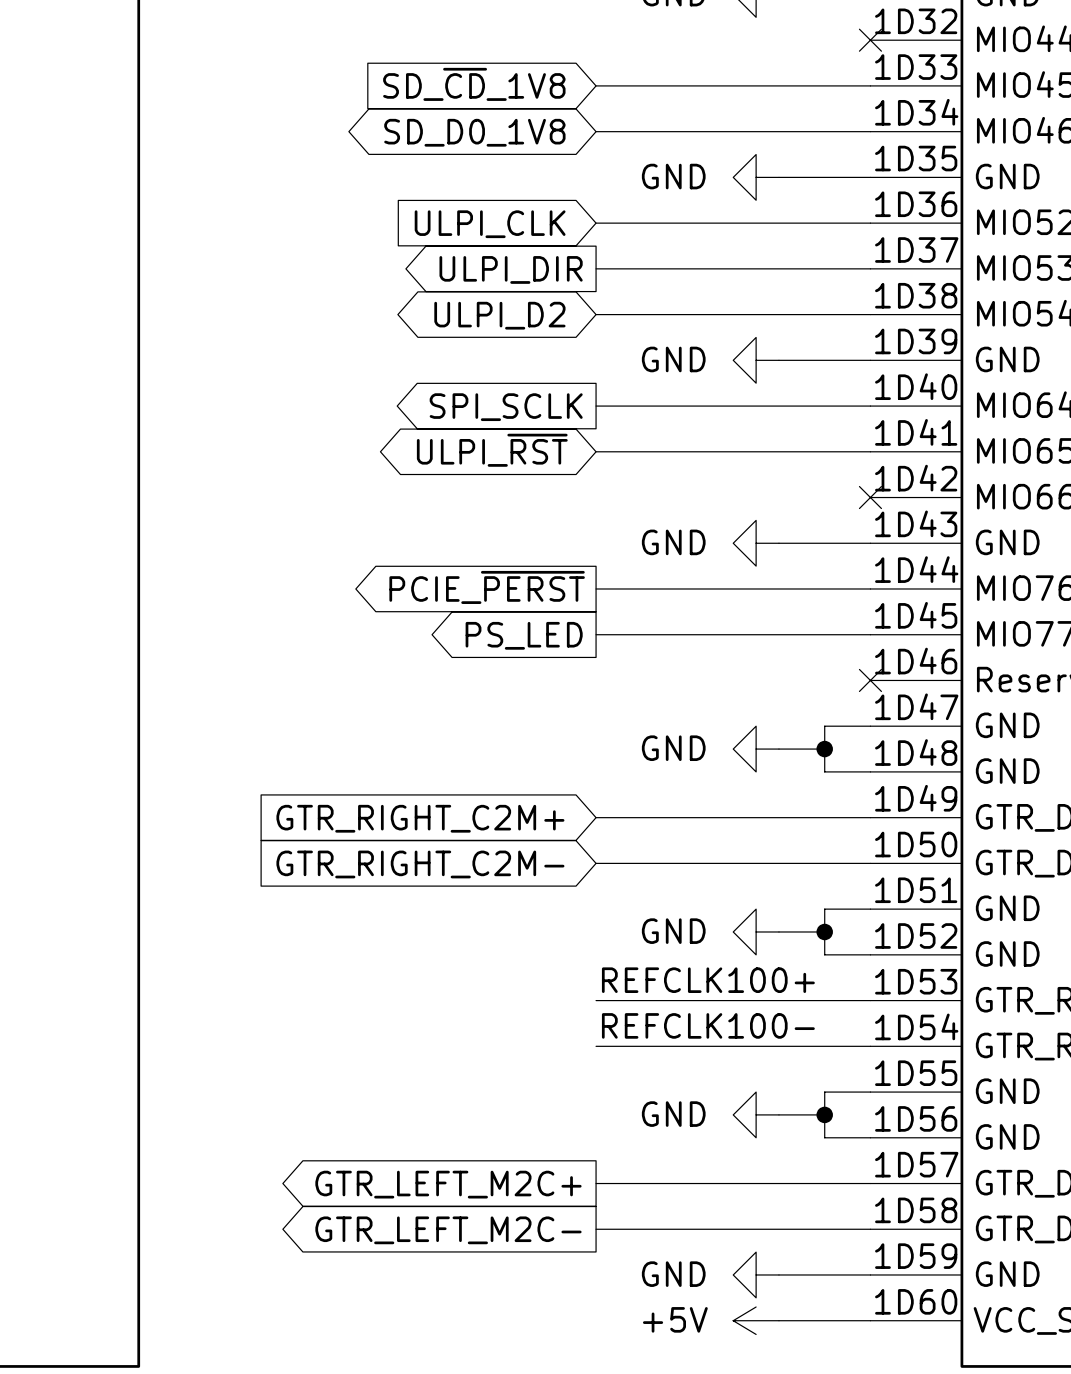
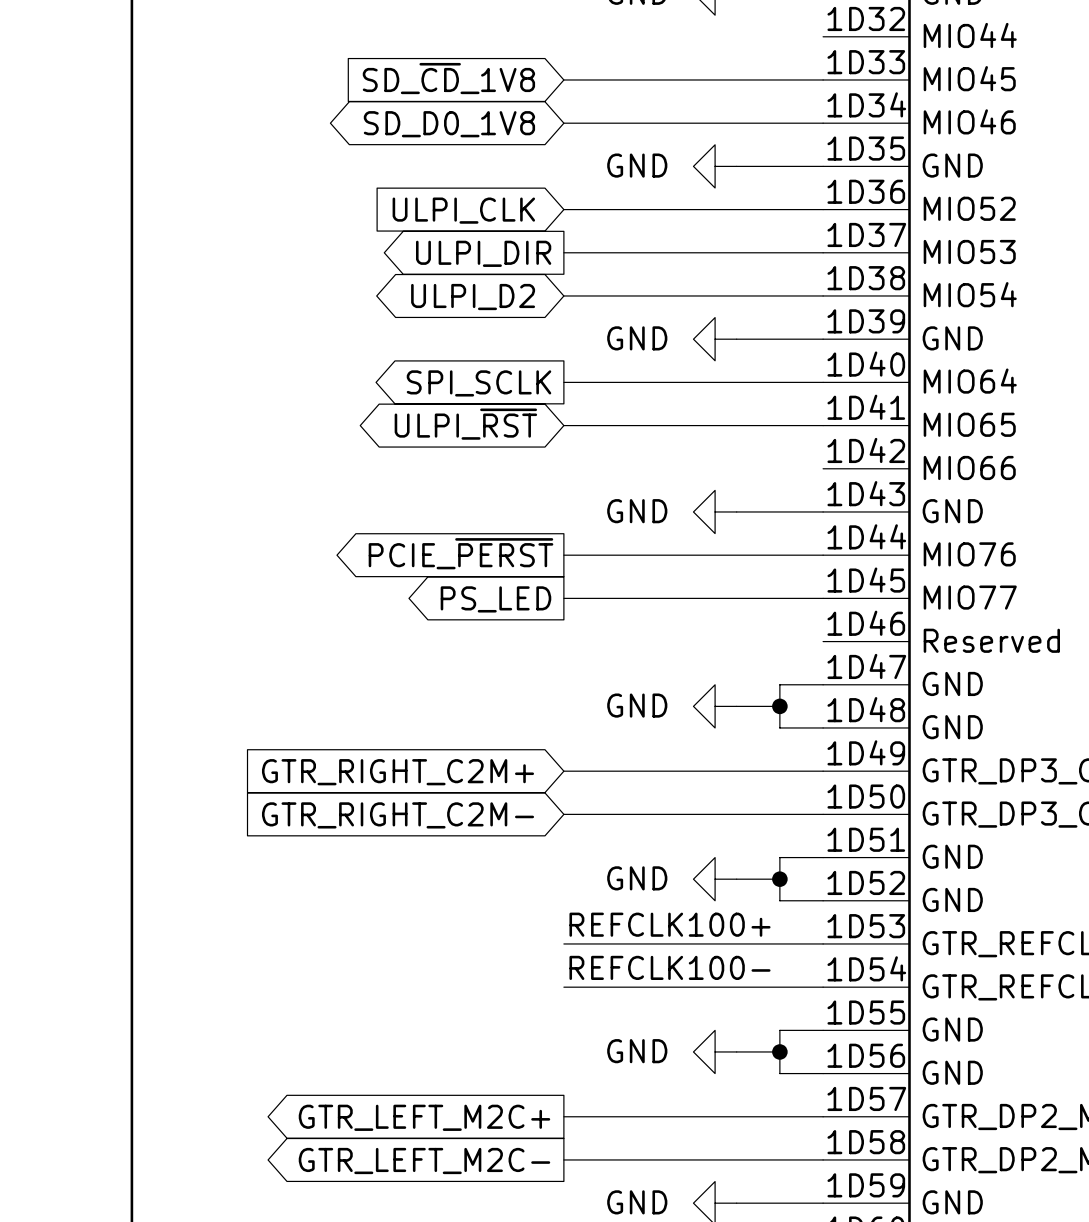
no-connect mark: (870, 40) -> none
no-connect mark: (870, 497) -> none
no-connect mark: (870, 680) -> none

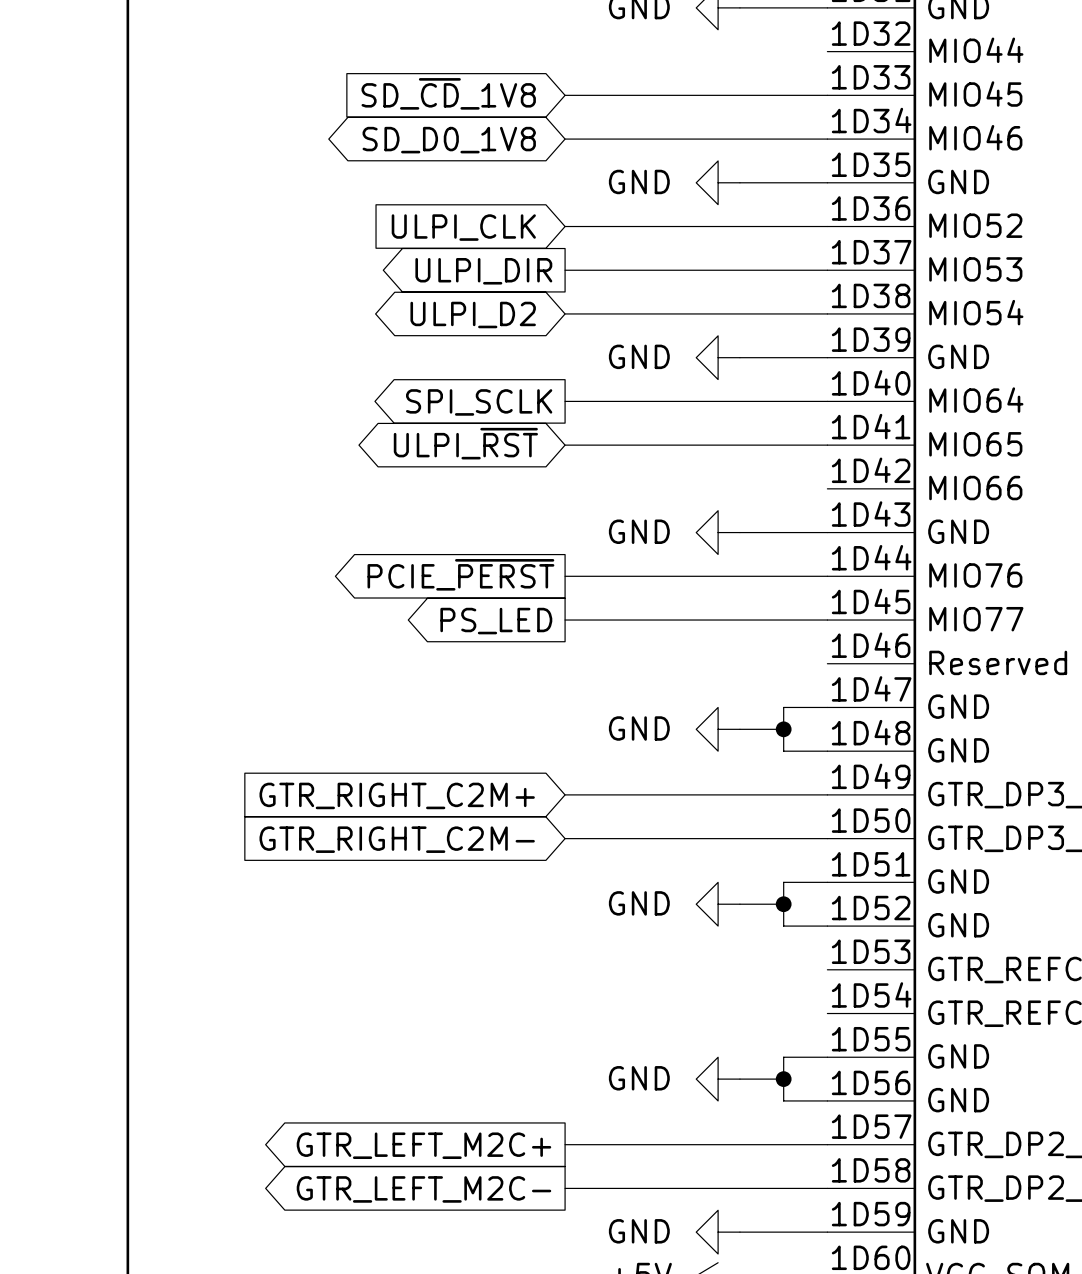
label: REFCLK100+ (669, 924) -> none
wire: (563, 943) (823, 943) -> none
label: REFCLK100- (669, 967) -> none
wire: (563, 987) (823, 987) -> none

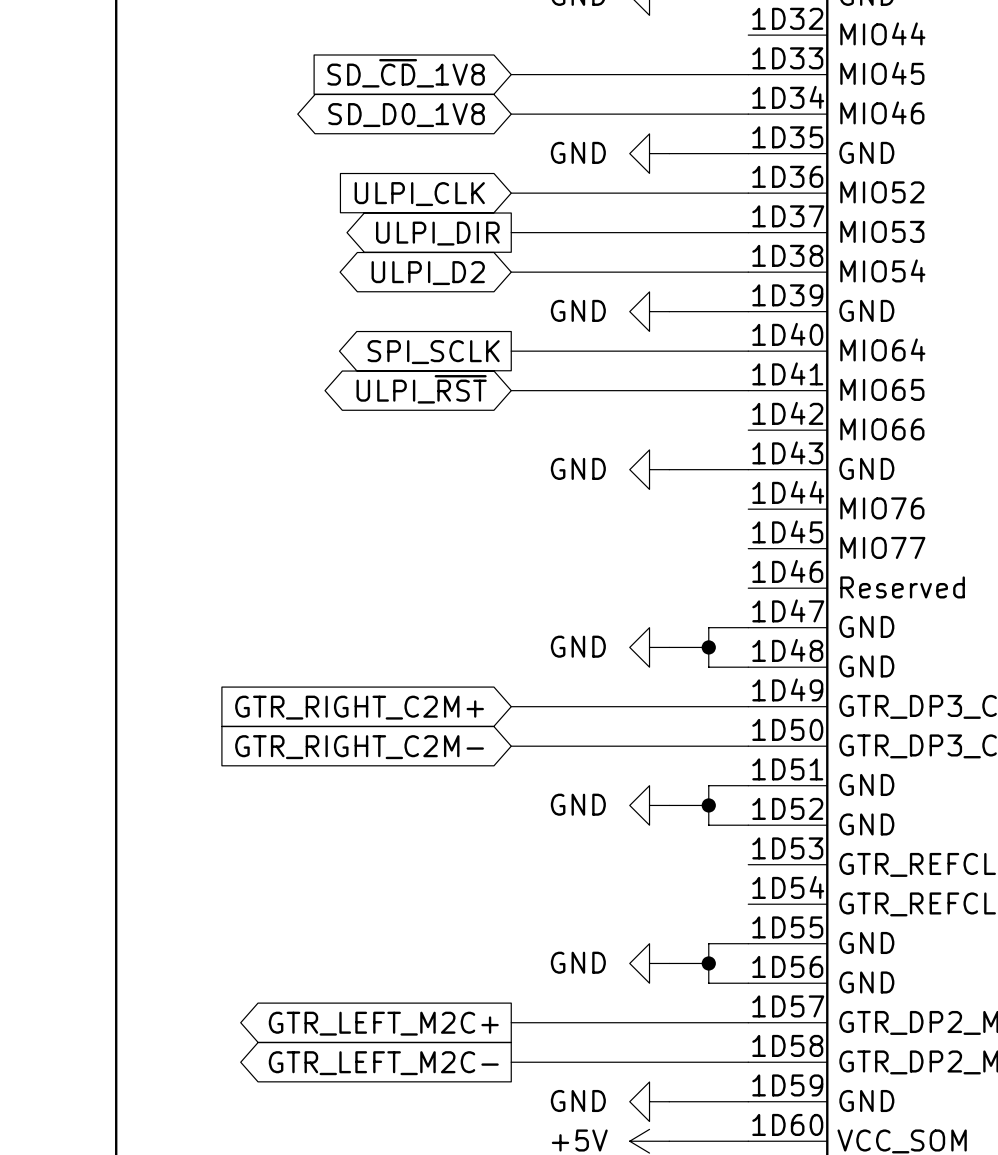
global label: PCIE_~{PERST} (460, 574) -> none
wire: (565, 576) (827, 576) -> none
wire: (565, 620) (827, 620) -> none
global label: PS_LED (496, 621) -> none

